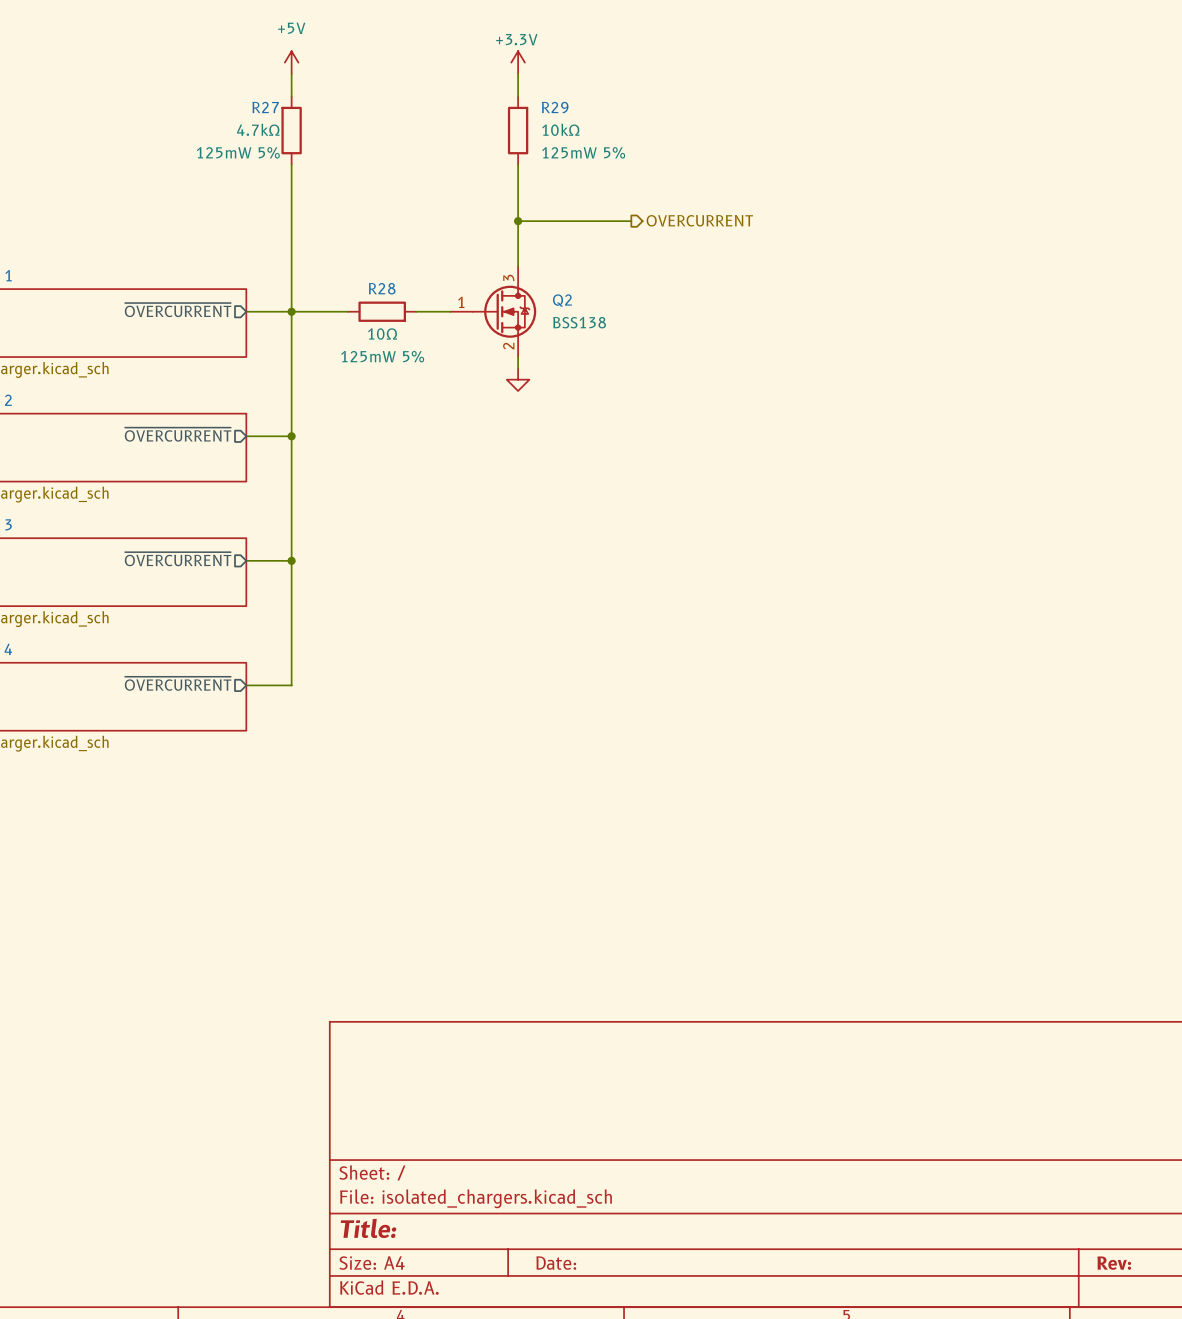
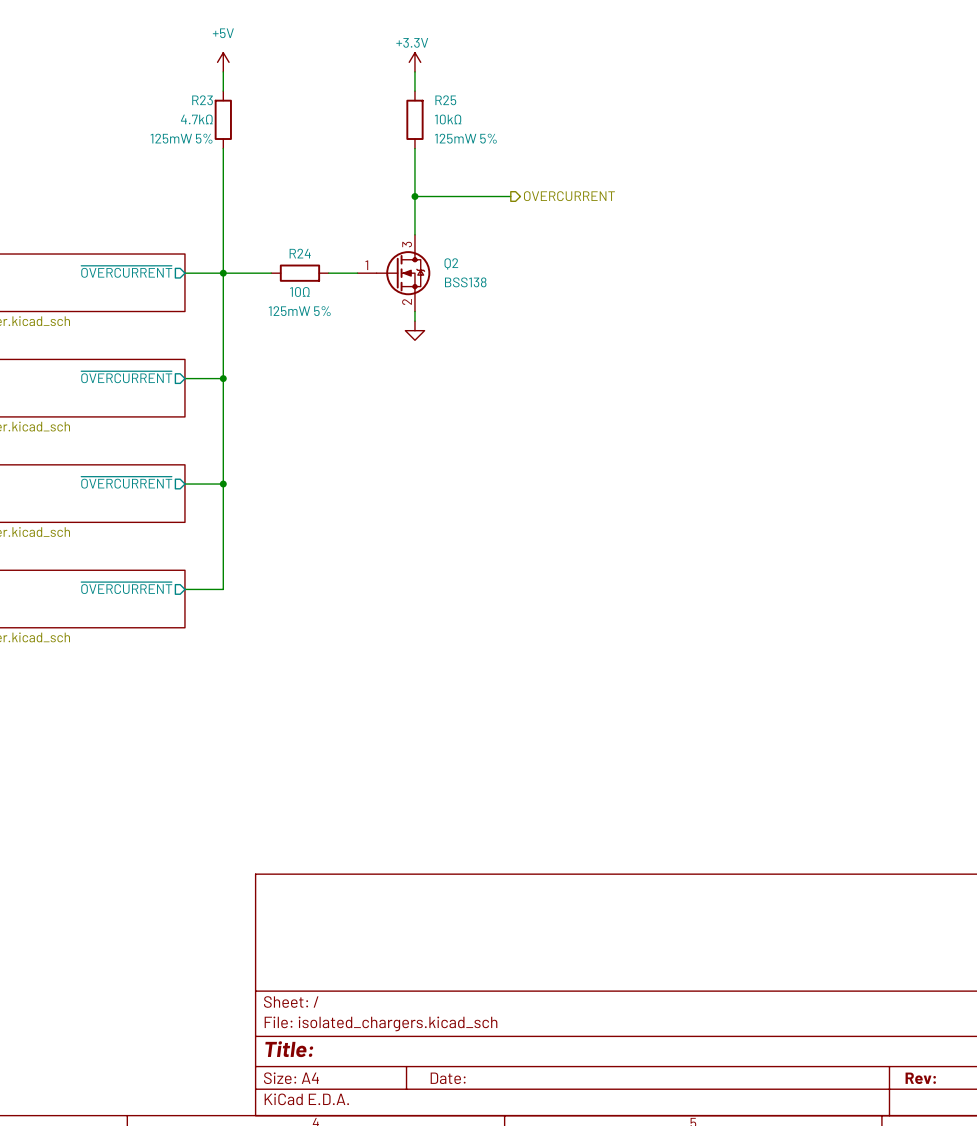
R27 name: R27 (265, 107) -> R23 (202, 100)
R29 name: R29 (555, 107) -> R25 (445, 100)
R28 name: R28 (382, 288) -> R24 (300, 253)

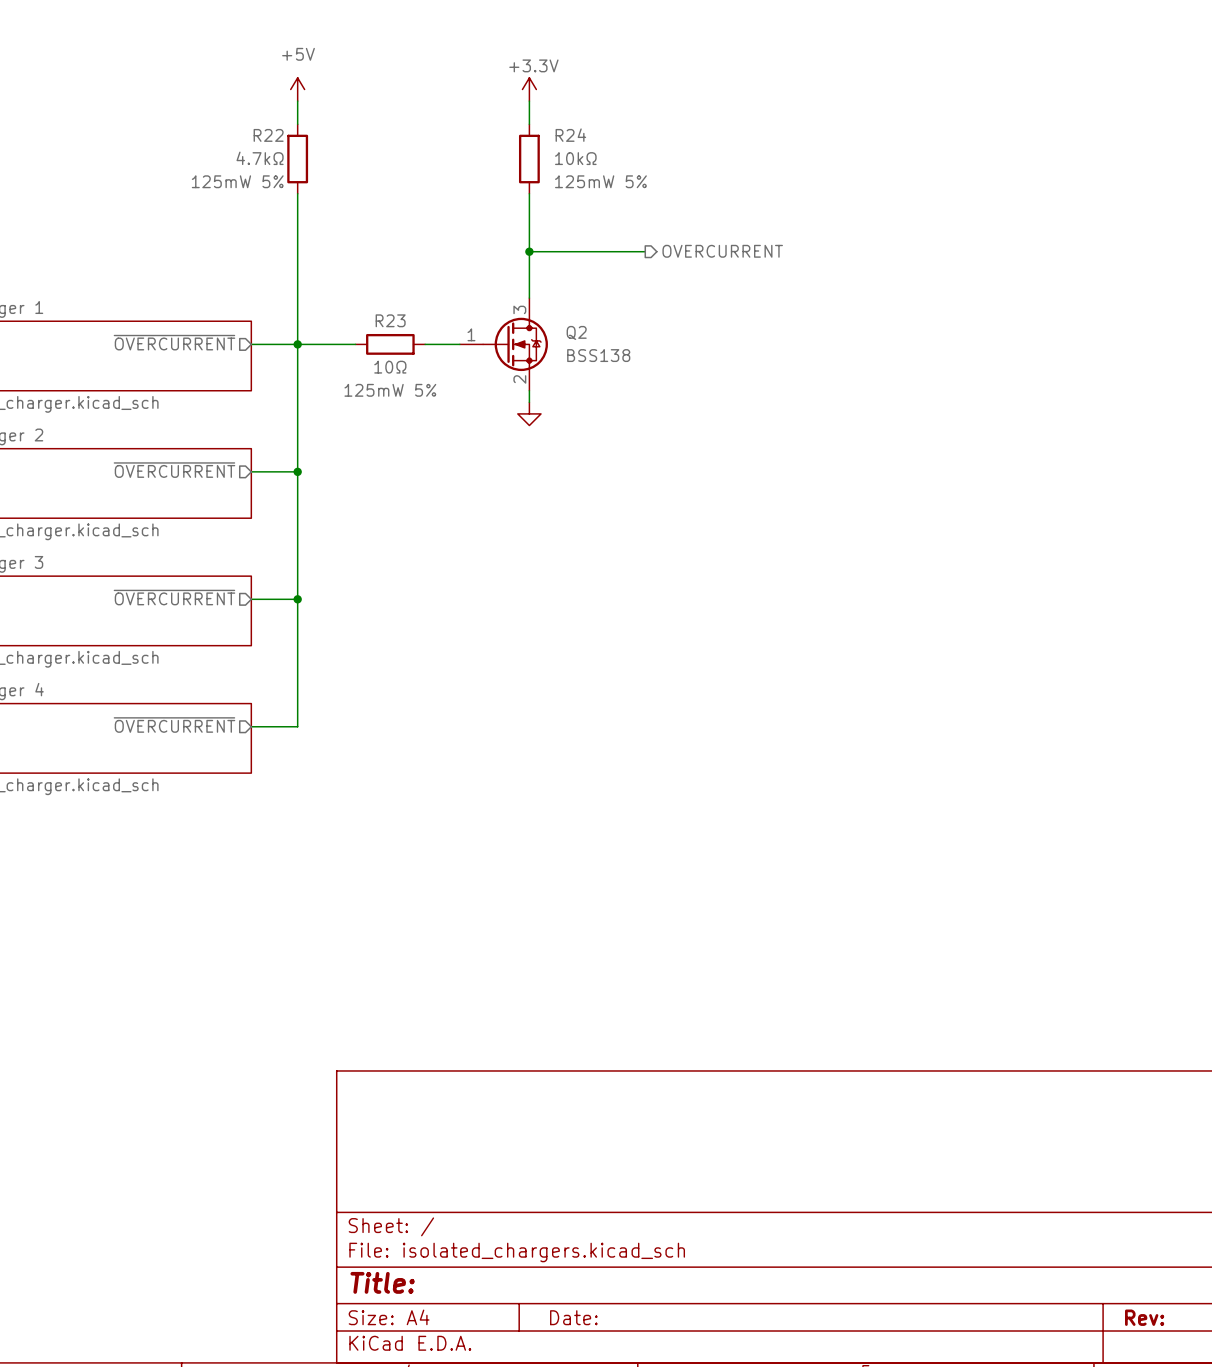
R23 name: R23 (202, 100) -> R22 (268, 135)
R25 name: R25 (445, 100) -> R24 (570, 135)
R24 name: R24 (300, 253) -> R23 (390, 320)

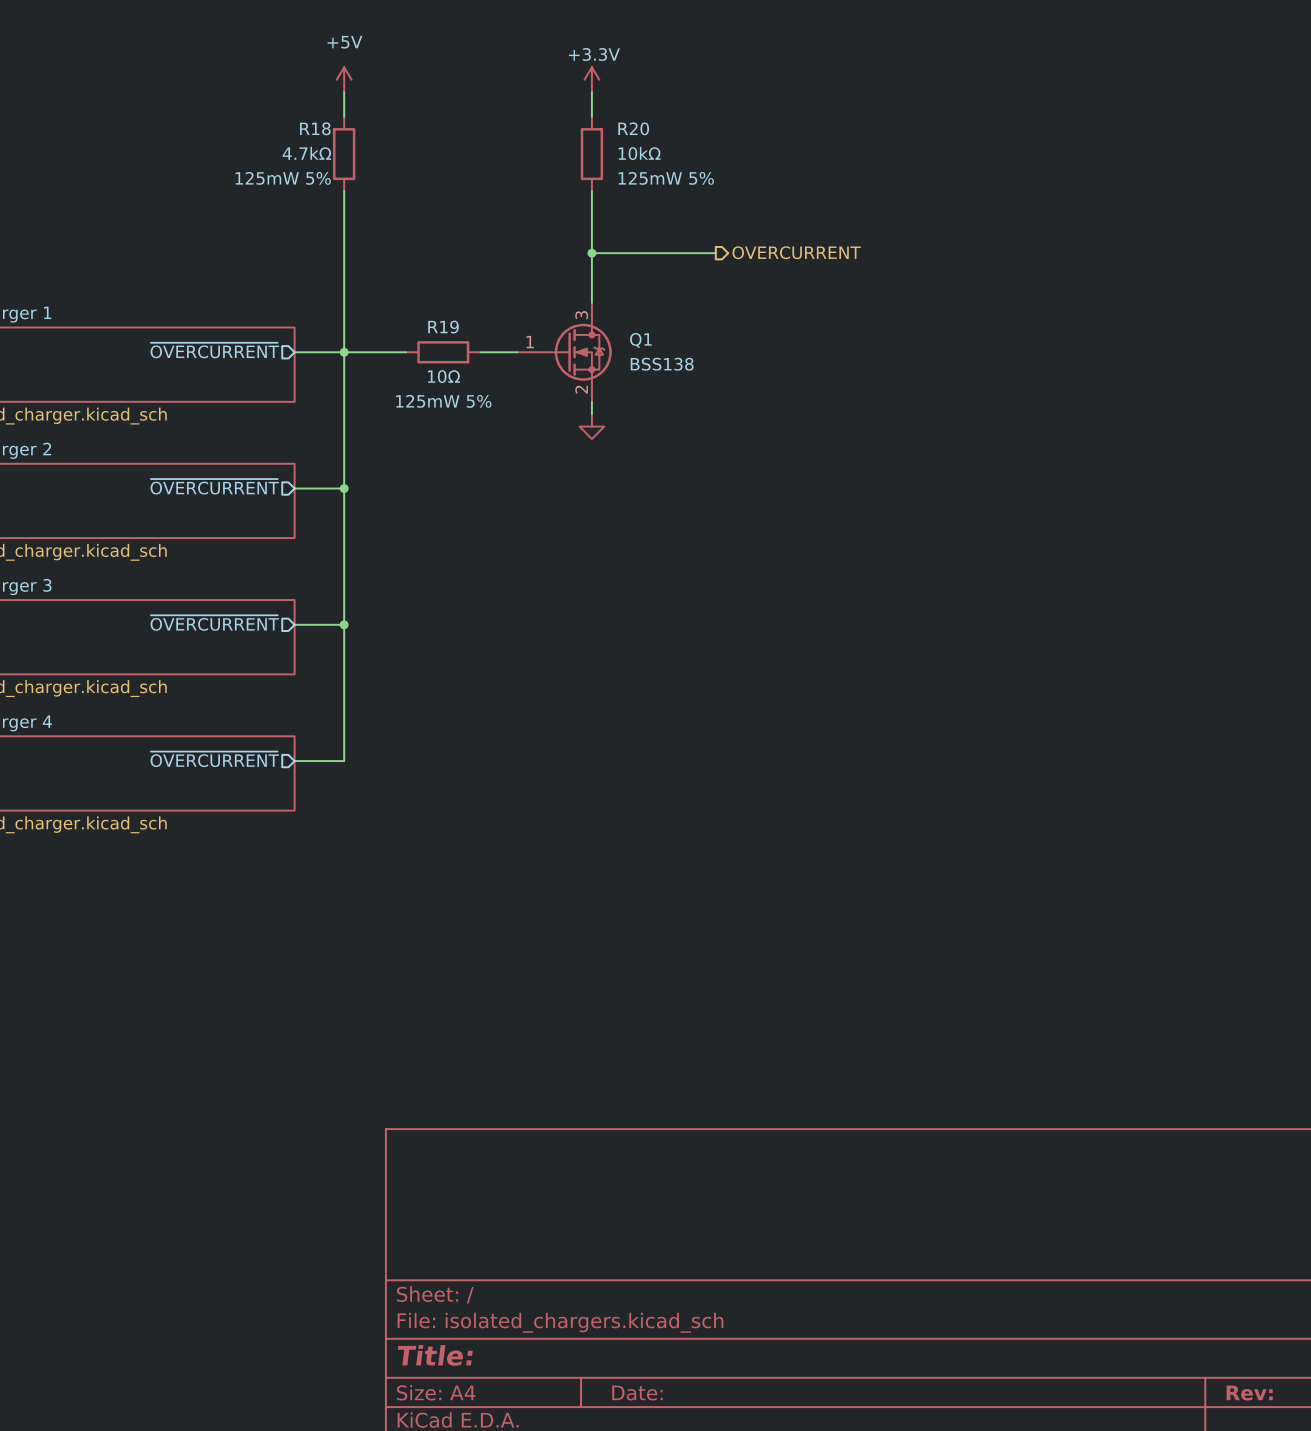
R22 name: R22 (268, 135) -> R18 (315, 128)
R24 name: R24 (570, 135) -> R20 (633, 128)
R23 name: R23 (390, 320) -> R19 (443, 327)
Q2 name: Q2 (576, 332) -> Q1 (640, 340)

